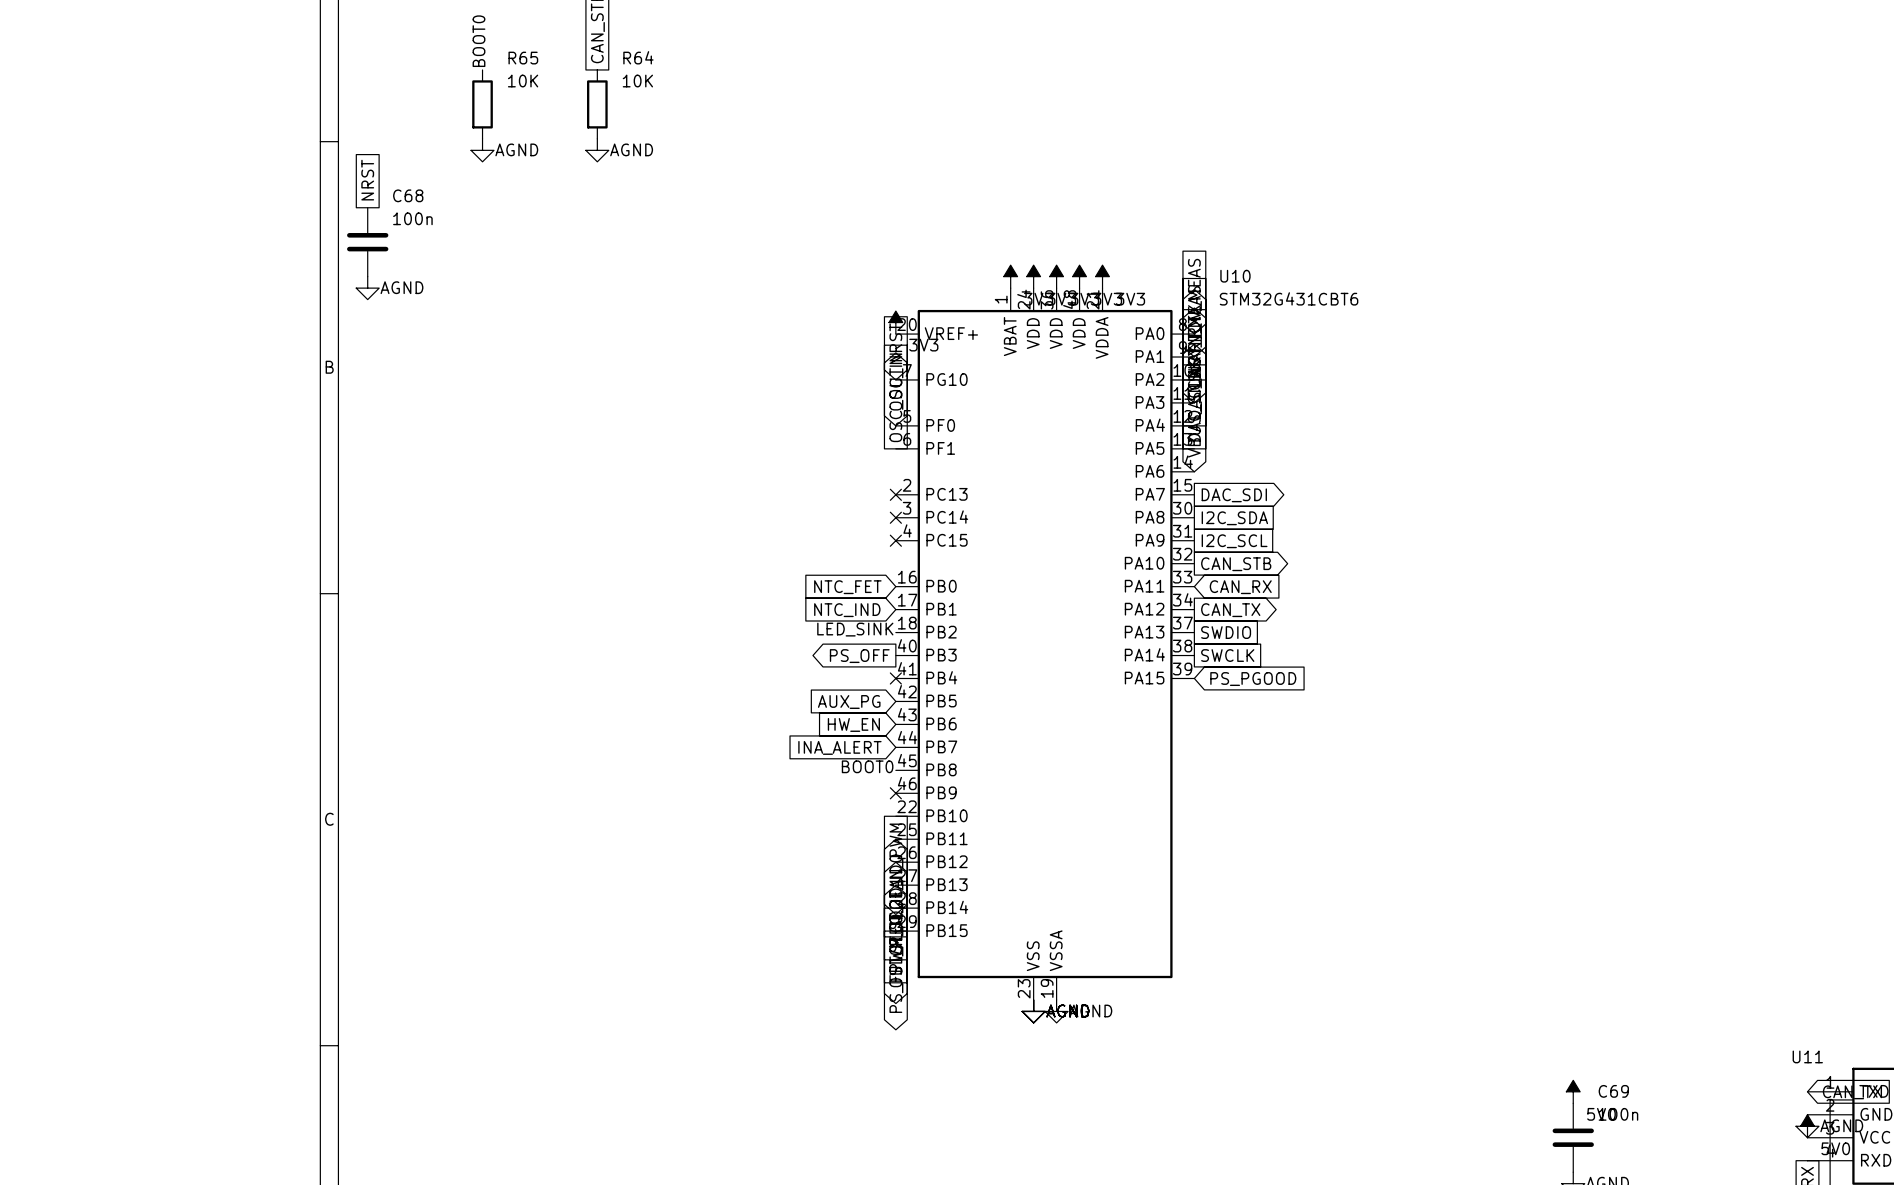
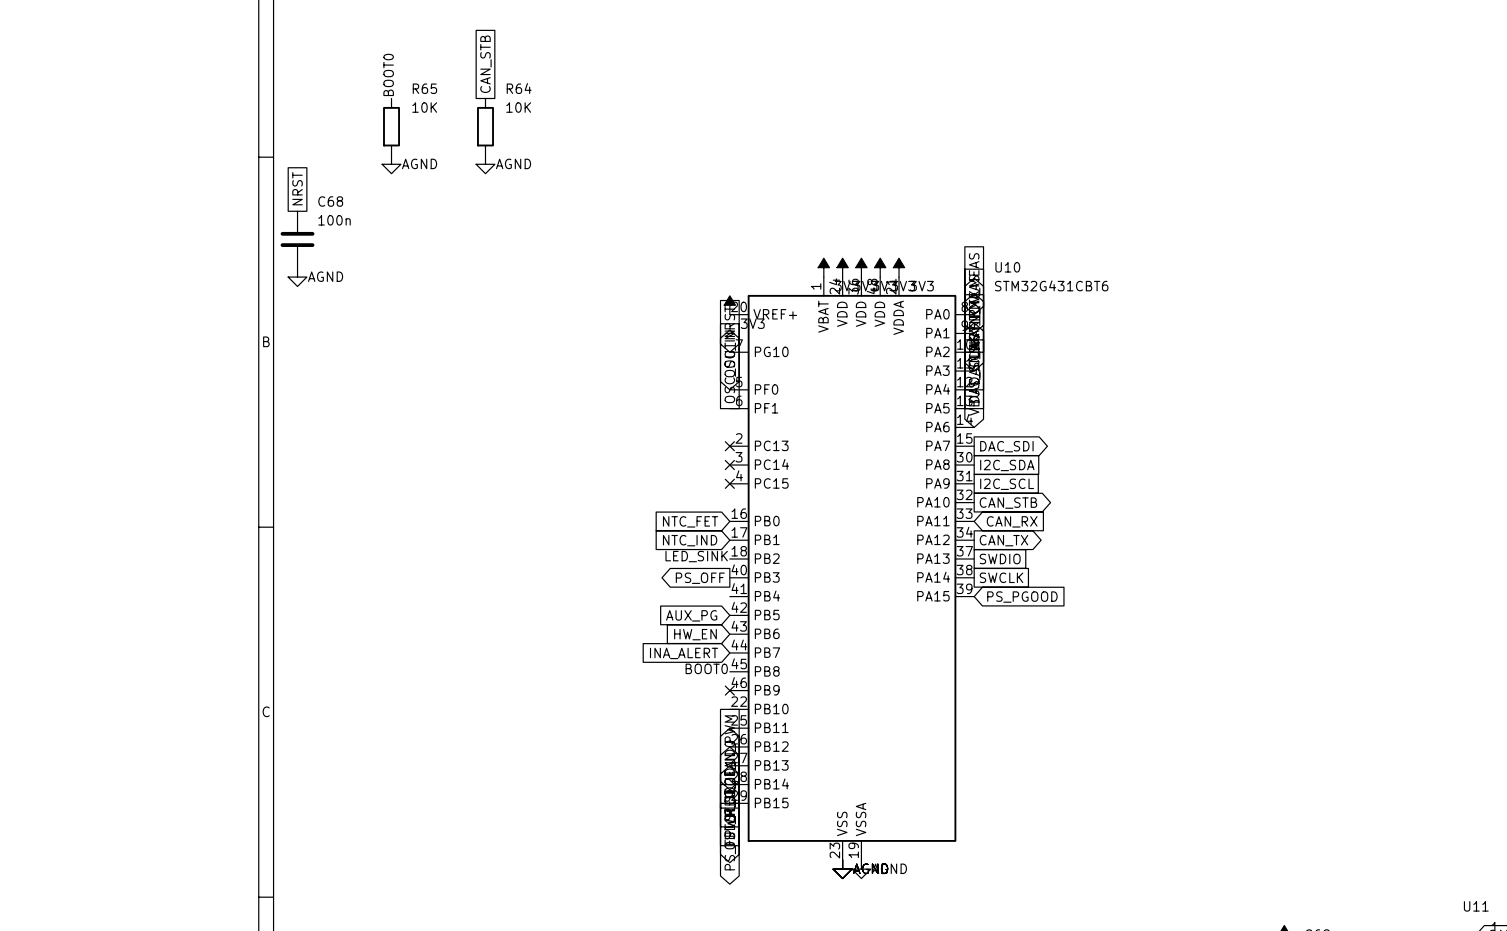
no-connect mark: (895, 678) -> none

